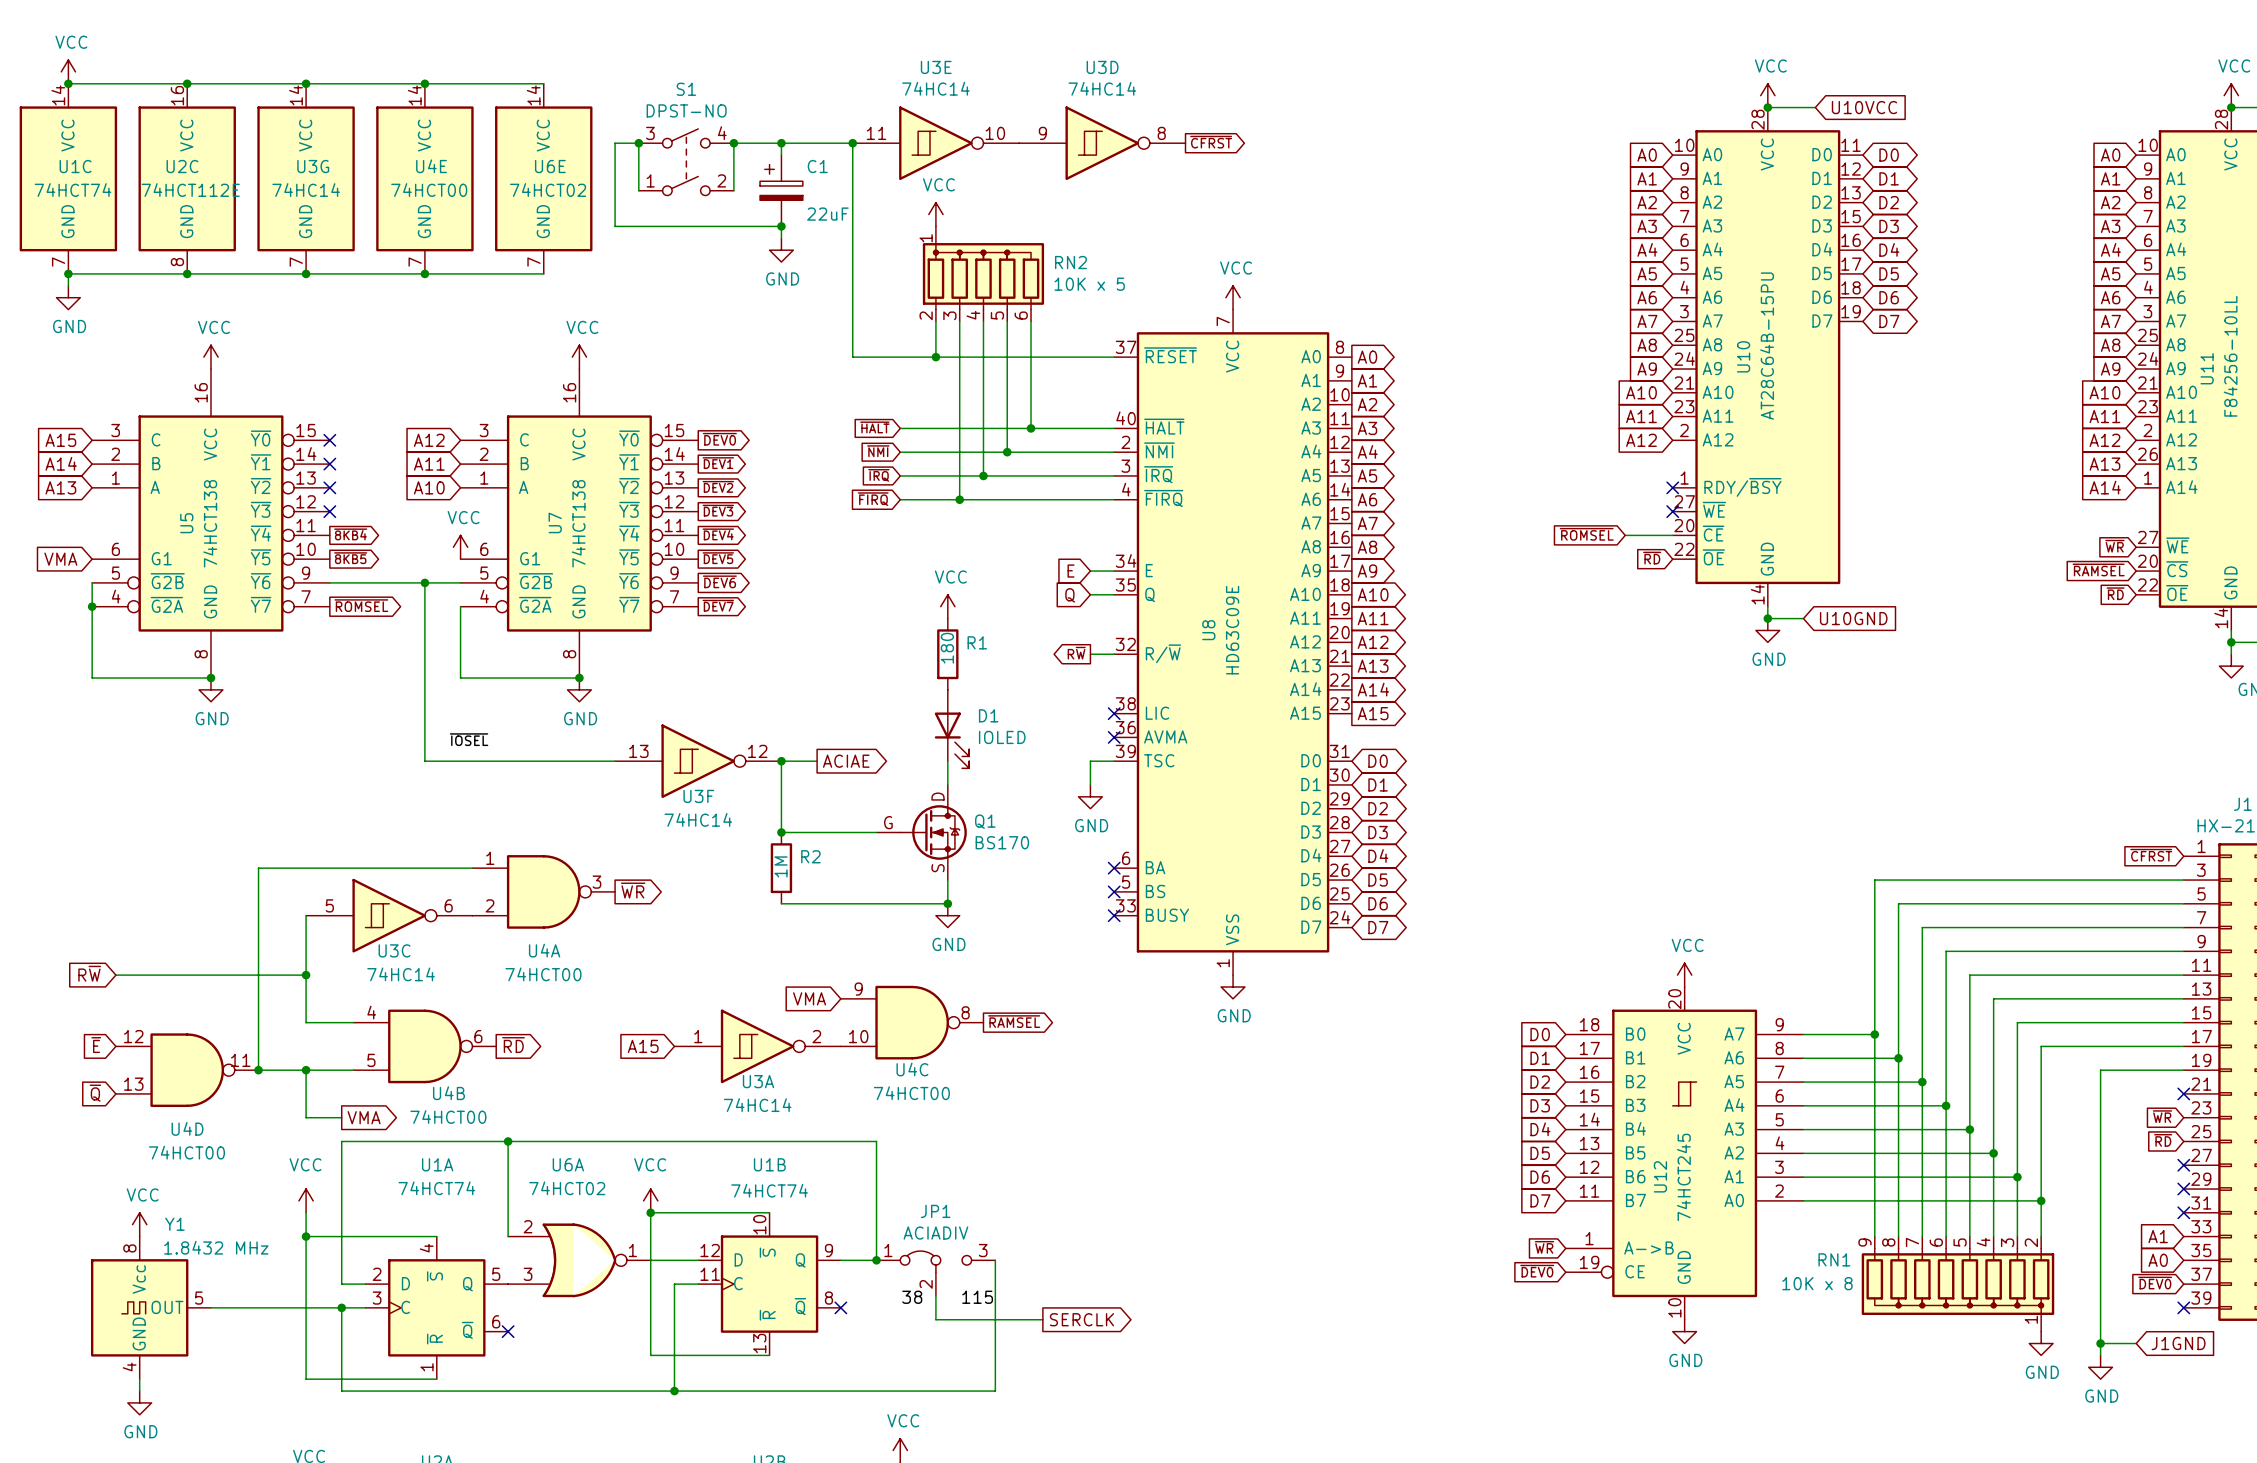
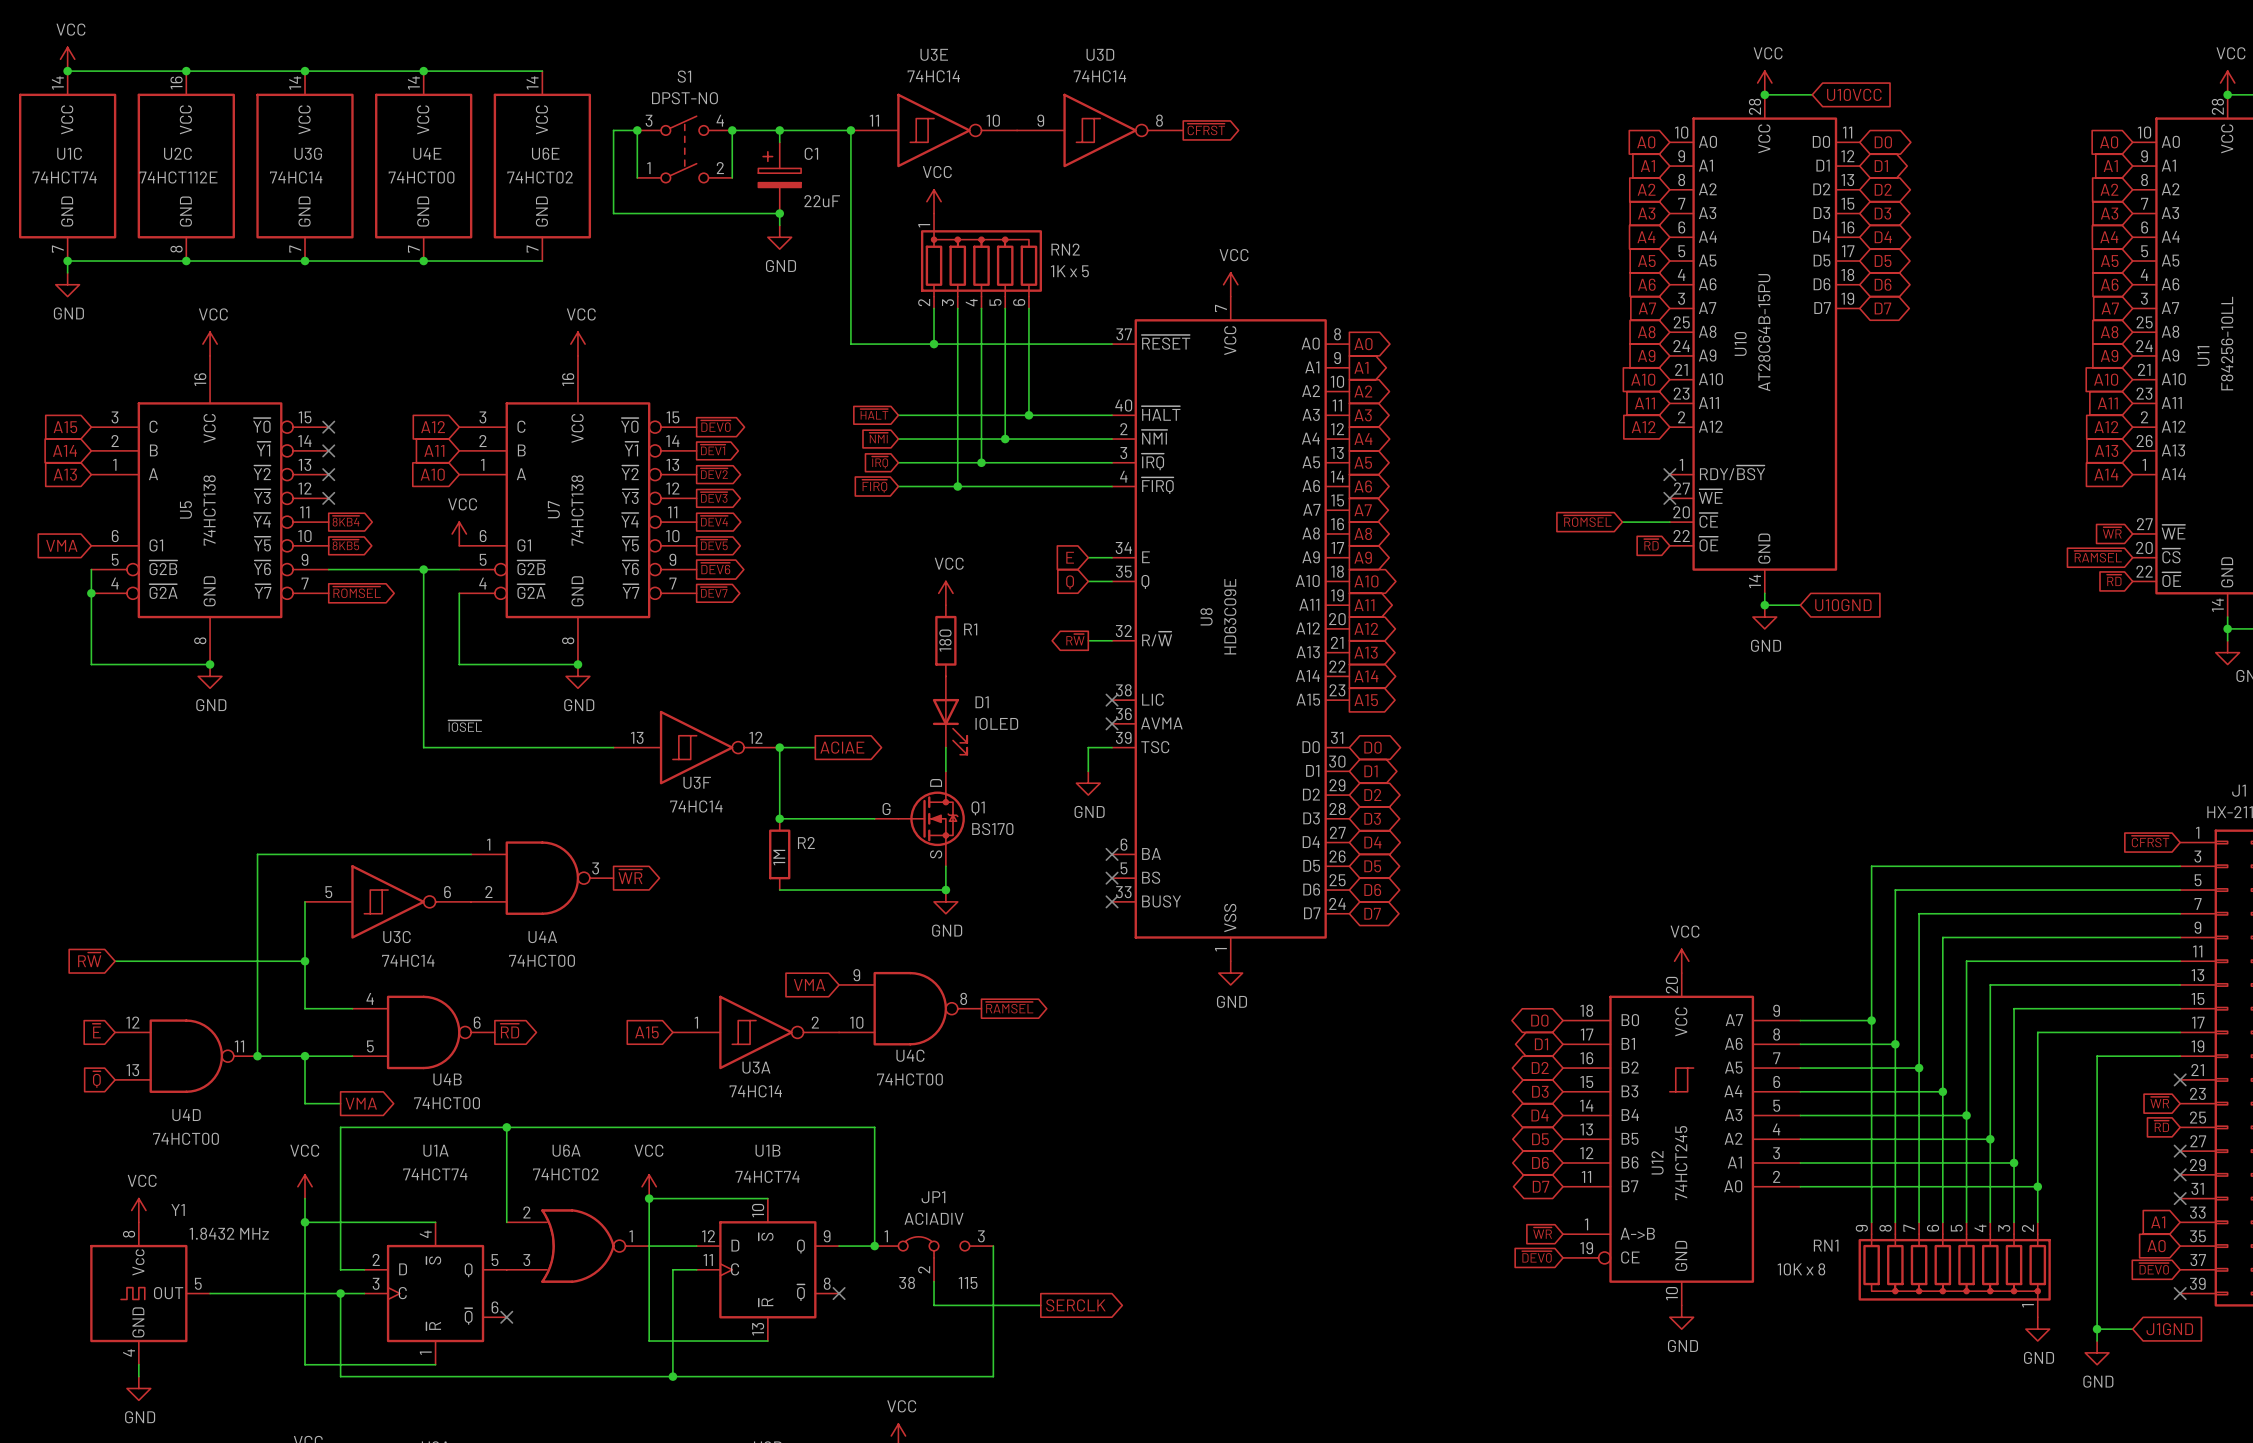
RN2 value: 10K x 5 (1089, 284) -> 1K x 5 (1069, 271)
global label shape: input (1540, 1034) -> bidirectional (1539, 1020)
global label shape: input (1540, 1058) -> bidirectional (1541, 1044)
global label shape: input (1540, 1082) -> bidirectional (1540, 1067)
global label shape: input (1540, 1105) -> bidirectional (1540, 1091)
global label shape: input (1540, 1129) -> bidirectional (1540, 1115)
global label shape: input (1540, 1153) -> bidirectional (1540, 1139)
global label shape: input (1540, 1177) -> bidirectional (1540, 1162)
global label shape: input (1540, 1200) -> bidirectional (1541, 1186)

